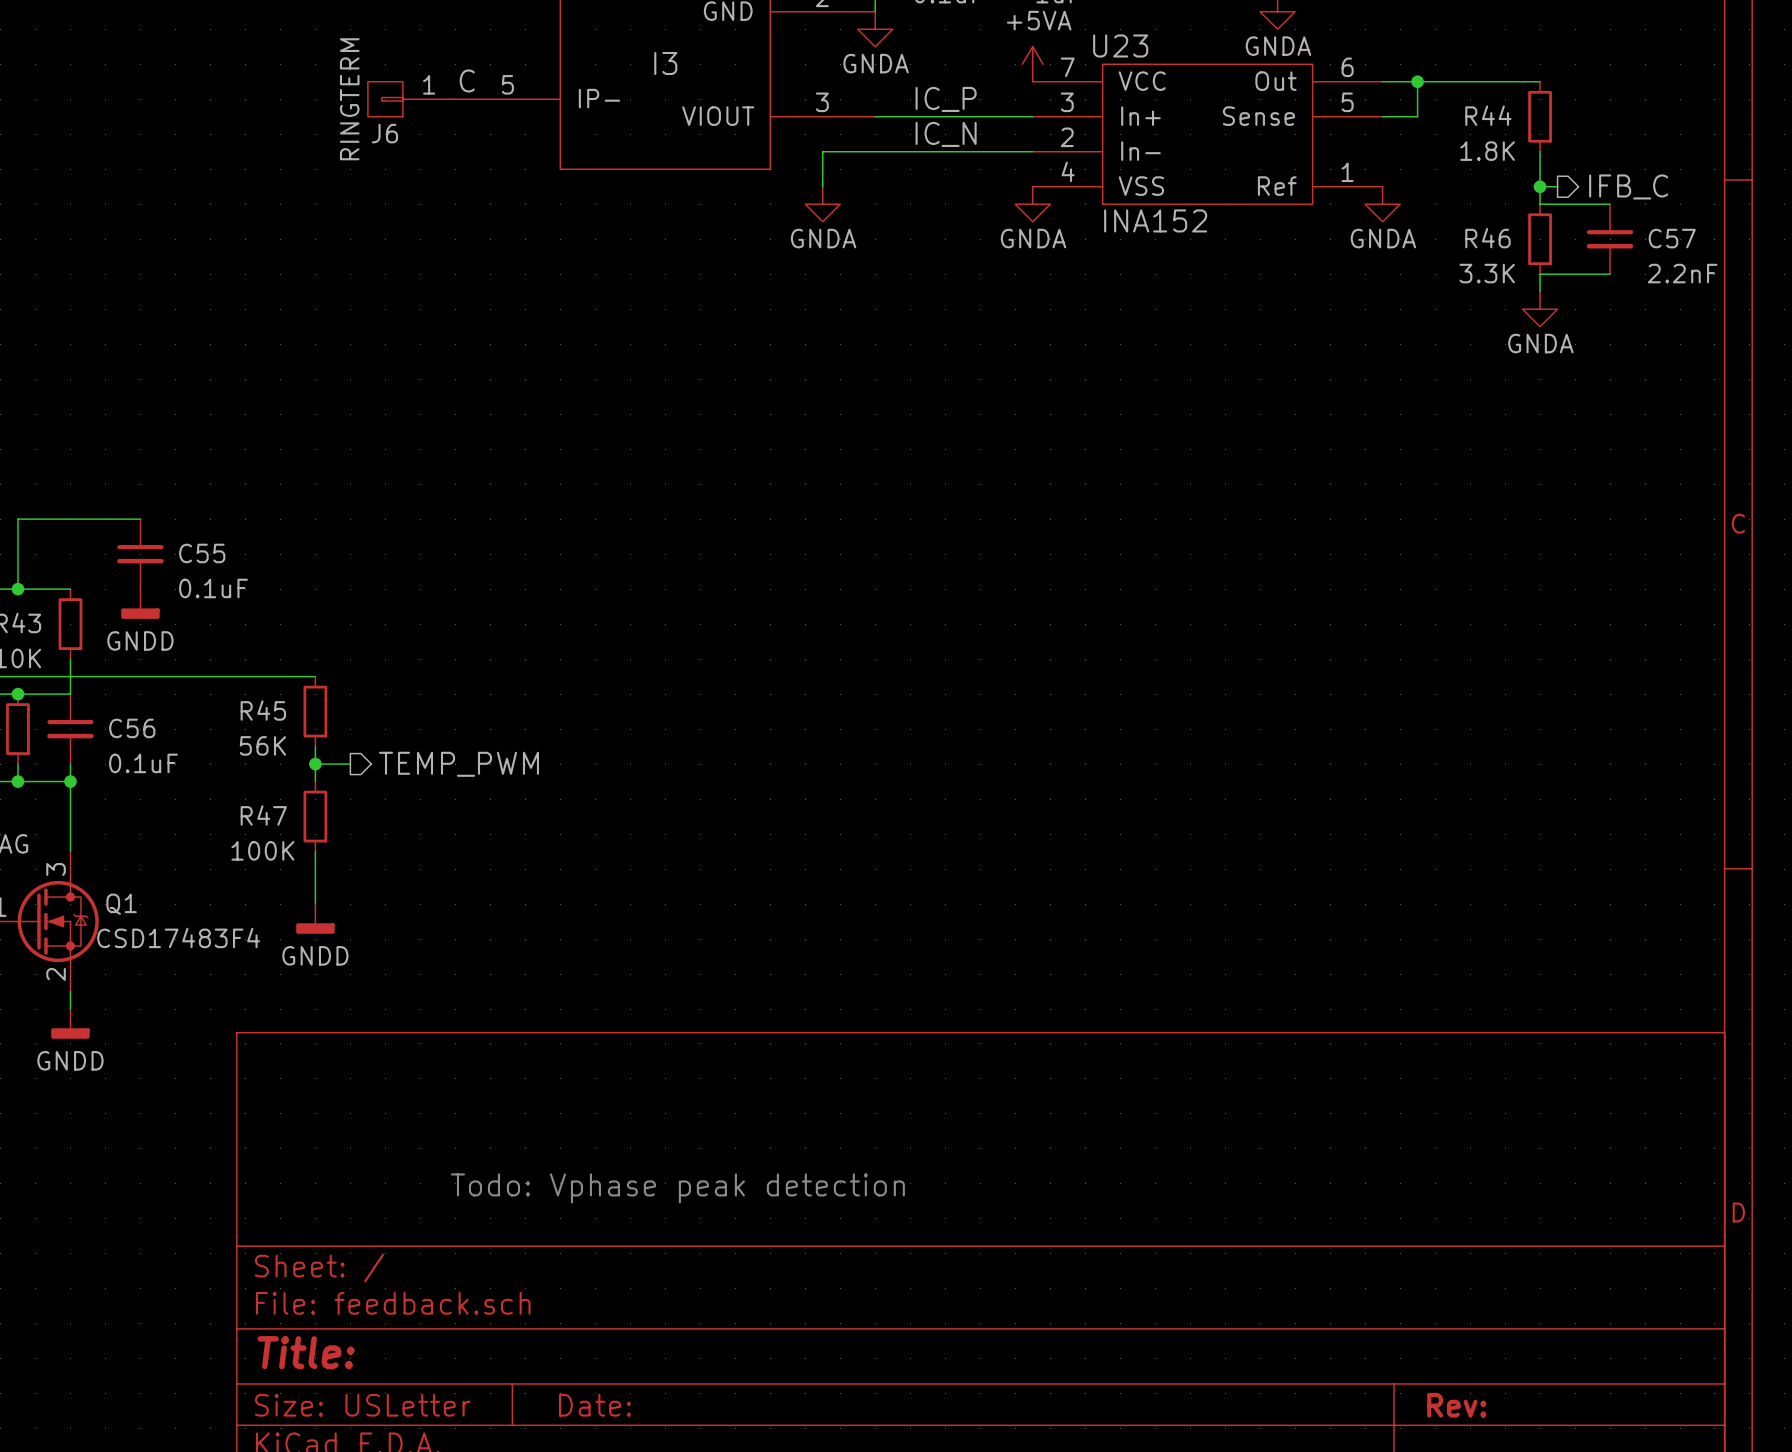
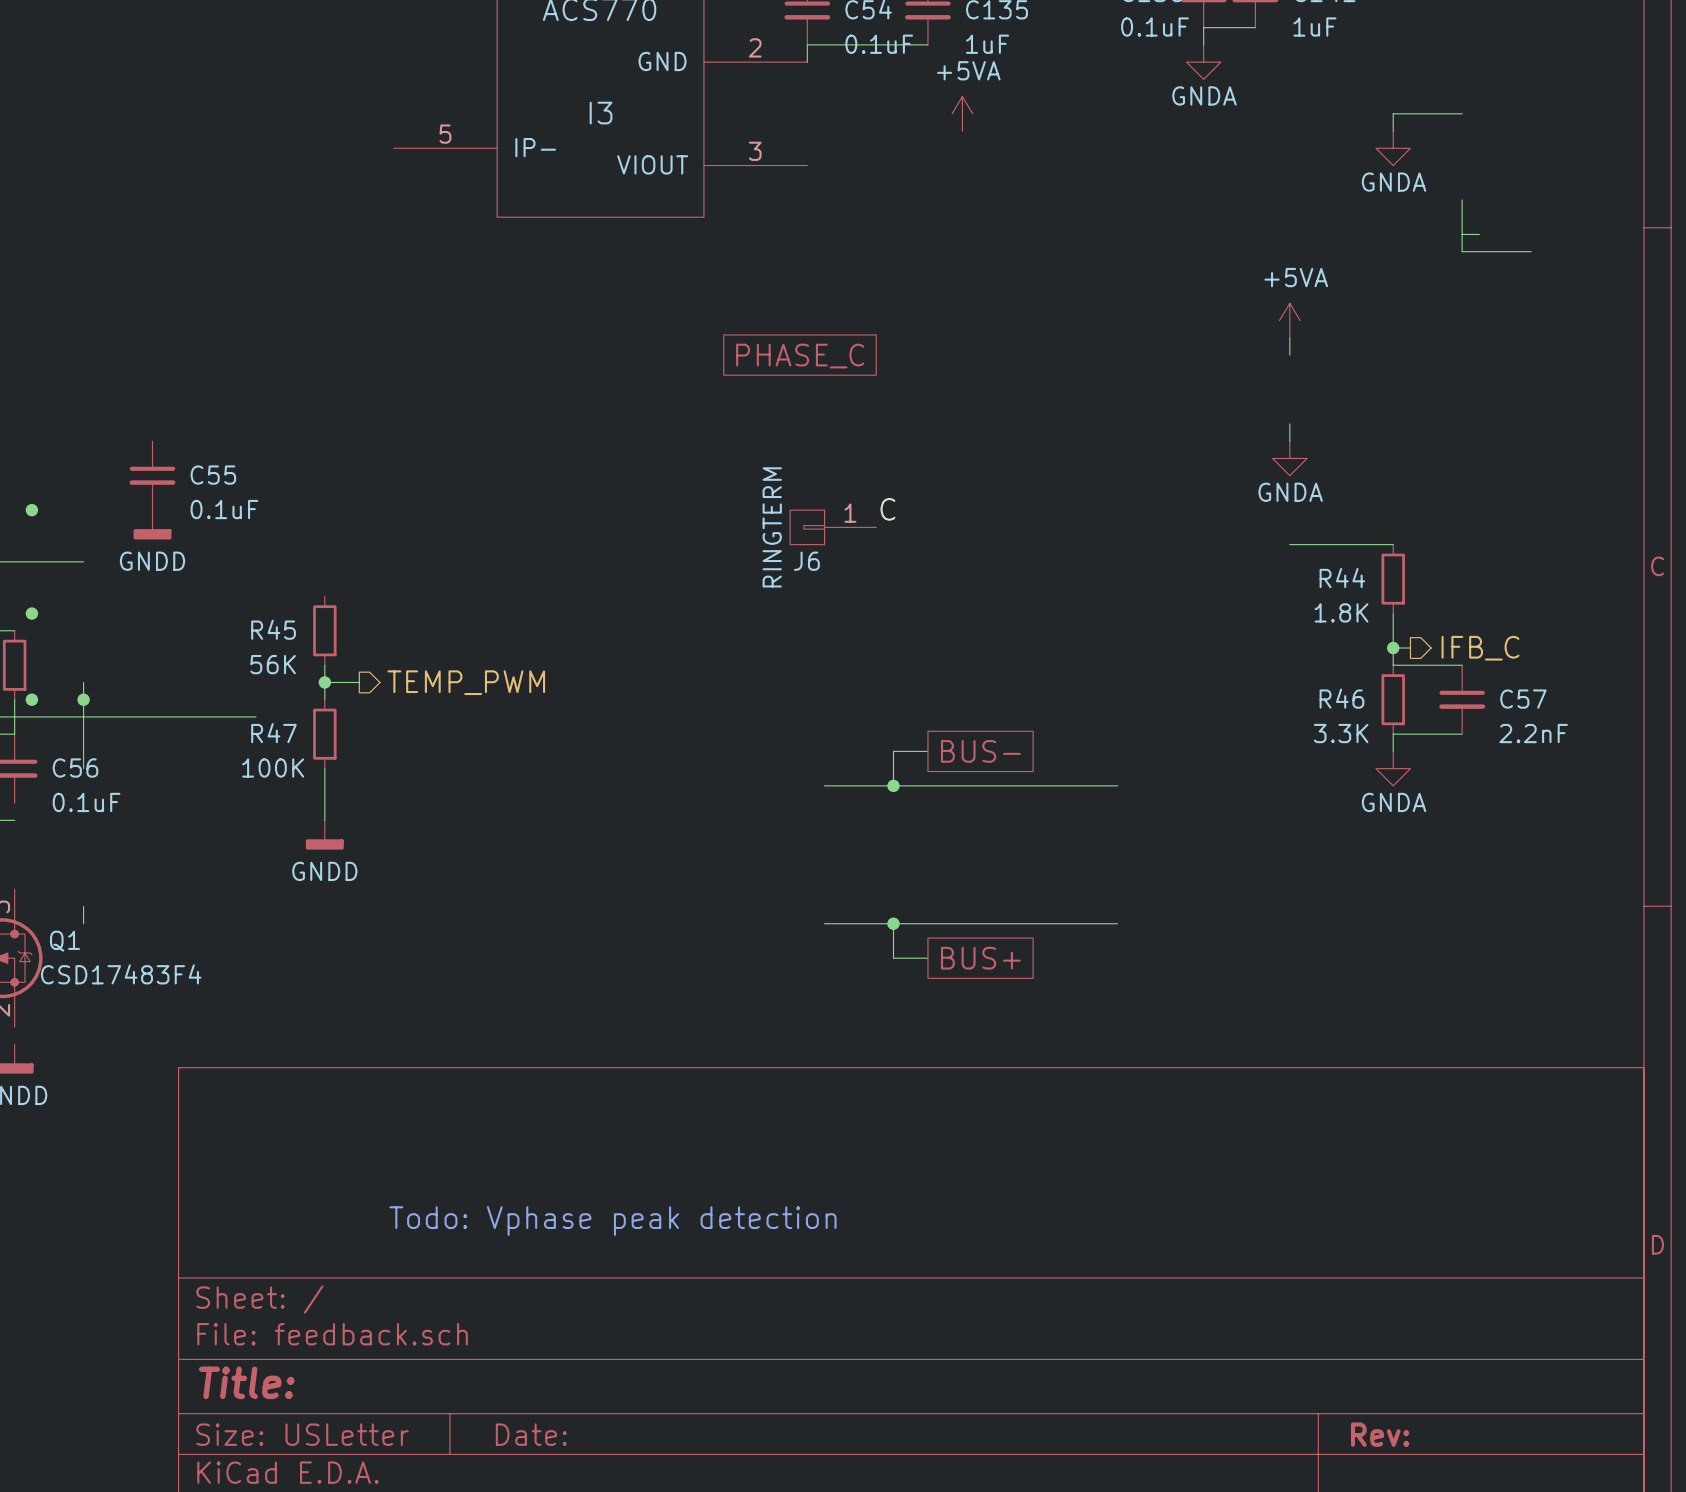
power symbol: GNDA (875, 29) -> none
label: C (467, 80) -> none
wire: (1382, 81) (1540, 81) -> none
wire: (1417, 81) (1417, 116) (1382, 116) -> none
junction: (1417, 81) -> none
J6 position: (411, 99) -> (833, 527)
label: IC_P (946, 99) -> none
power symbol: none -> GNDA (1393, 148)
wire: (875, 116) (1032, 116) -> none
R44 position: (1540, 116) -> (1393, 579)
label: IC_N (946, 134) -> none
U23: INA152 (1207, 134) -> none
wire: (1032, 151) (822, 151) (822, 186) -> none
junction: (1540, 186) -> none
hierarchical label: IFB_C (1628, 186) -> none
power symbol: GNDA (822, 204) -> none
power symbol: GNDA (1032, 204) -> none
power symbol: GNDA (1382, 204) -> none
R46 position: (1540, 239) -> (1393, 699)
C57 position: (1610, 239) -> (1462, 699)
power symbol: none -> +5VA (1289, 320)
wire: (1610, 274) (1540, 274) (1540, 291) -> (1462, 113) (1393, 113) (1393, 131)
wire: none -> (1289, 337) (1289, 355)
power symbol: GNDA (1540, 309) -> none
global label: none -> PHASE_C (800, 356)
wire: none -> (1289, 424) (1289, 441)
power symbol: none -> GNDA (1289, 458)
label: none -> C (887, 509)
junction: none -> (31, 510)
wire: none -> (1289, 544) (1393, 544)
C55 position: (140, 554) -> (152, 475)
junction: none -> (31, 613)
wire: none -> (1393, 613) (1393, 665) (1462, 665)
power symbol position: GNDD (140, 603) -> GNDD (152, 524)
wire: none -> (1393, 648) (1410, 648)
junction: none -> (1393, 648)
hierarchical label: none -> IFB_C (1480, 648)
junction: none -> (324, 682)
junction: none -> (31, 699)
junction: none -> (83, 699)
wire: none -> (1462, 734) (1393, 734) (1393, 751)
R45 position: (315, 711) -> (324, 630)
wire: none -> (927, 751) (893, 751) (893, 785)
global label: none -> BUS- (980, 751)
power symbol: none -> GNDA (1393, 768)
wire: (315, 746) (315, 781) -> (324, 665) (324, 699)
wire: none -> (824, 785) (1117, 785)
junction: none -> (893, 785)
wire: (70, 764) (70, 851) -> (83, 682) (83, 768)
wire: (315, 764) (350, 764) -> (324, 682) (359, 682)
junction: (315, 764) -> none
hierarchical label position: TEMP_PWM (458, 764) -> TEMP_PWM (466, 682)
junction: (70, 781) -> none
R47 position: (315, 816) -> (324, 734)
wire: (315, 851) (315, 904) -> (324, 768) (324, 820)
wire: none -> (824, 923) (1117, 923)
wire: none -> (893, 923) (893, 958) (927, 958)
junction: none -> (893, 923)
power symbol position: GNDD (315, 918) -> GNDD (324, 834)
global label: none -> BUS+ (980, 958)
wire: (70, 991) (70, 1009) -> (83, 906) (83, 923)

